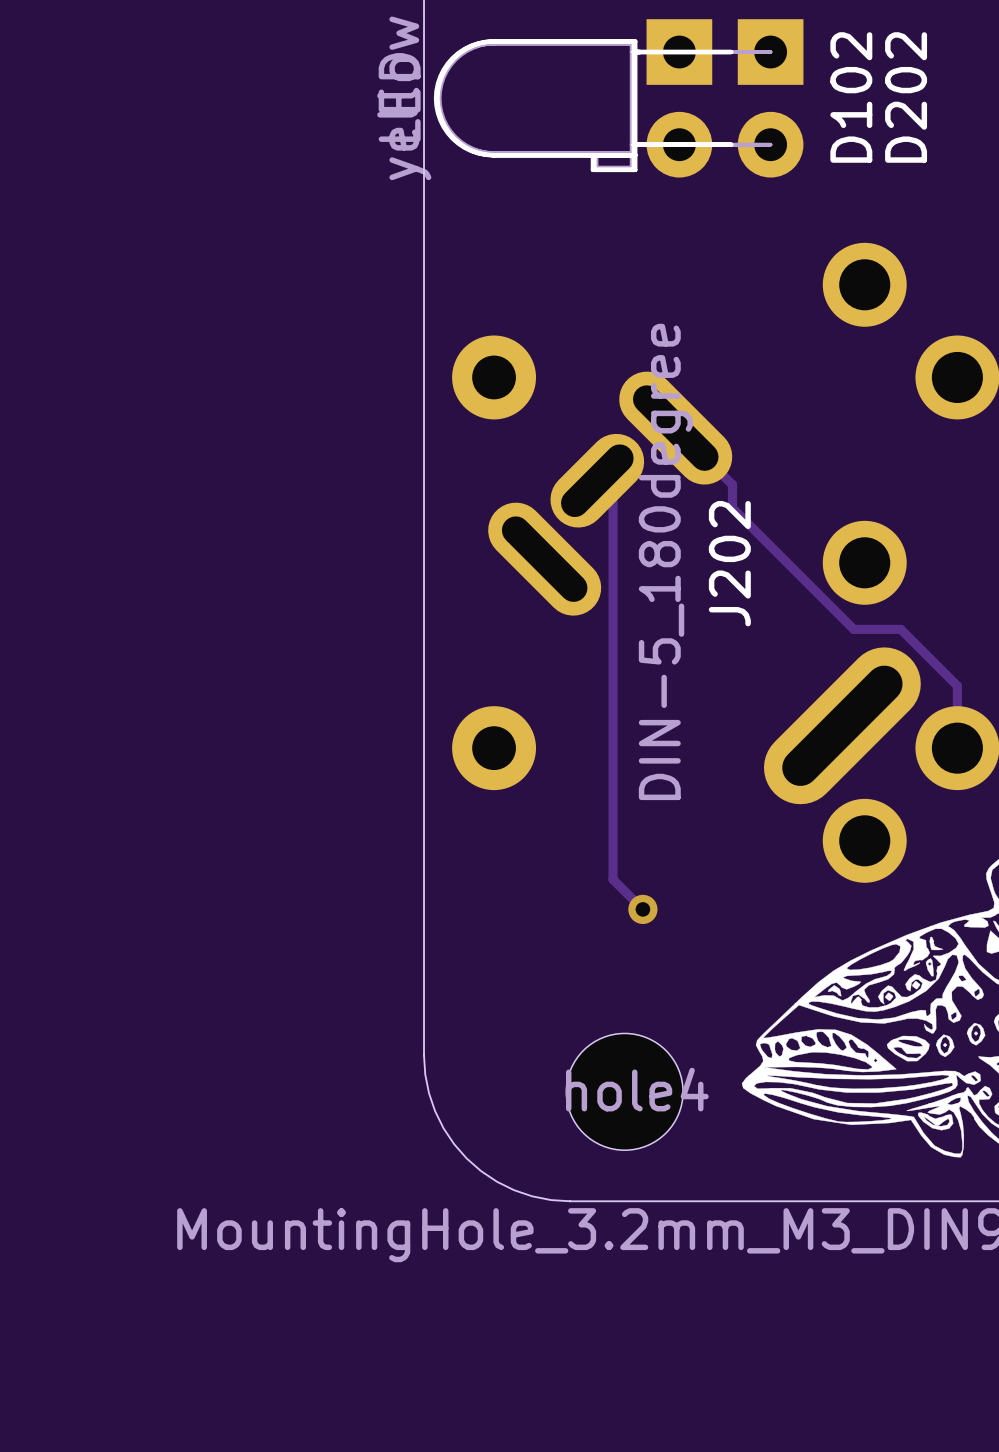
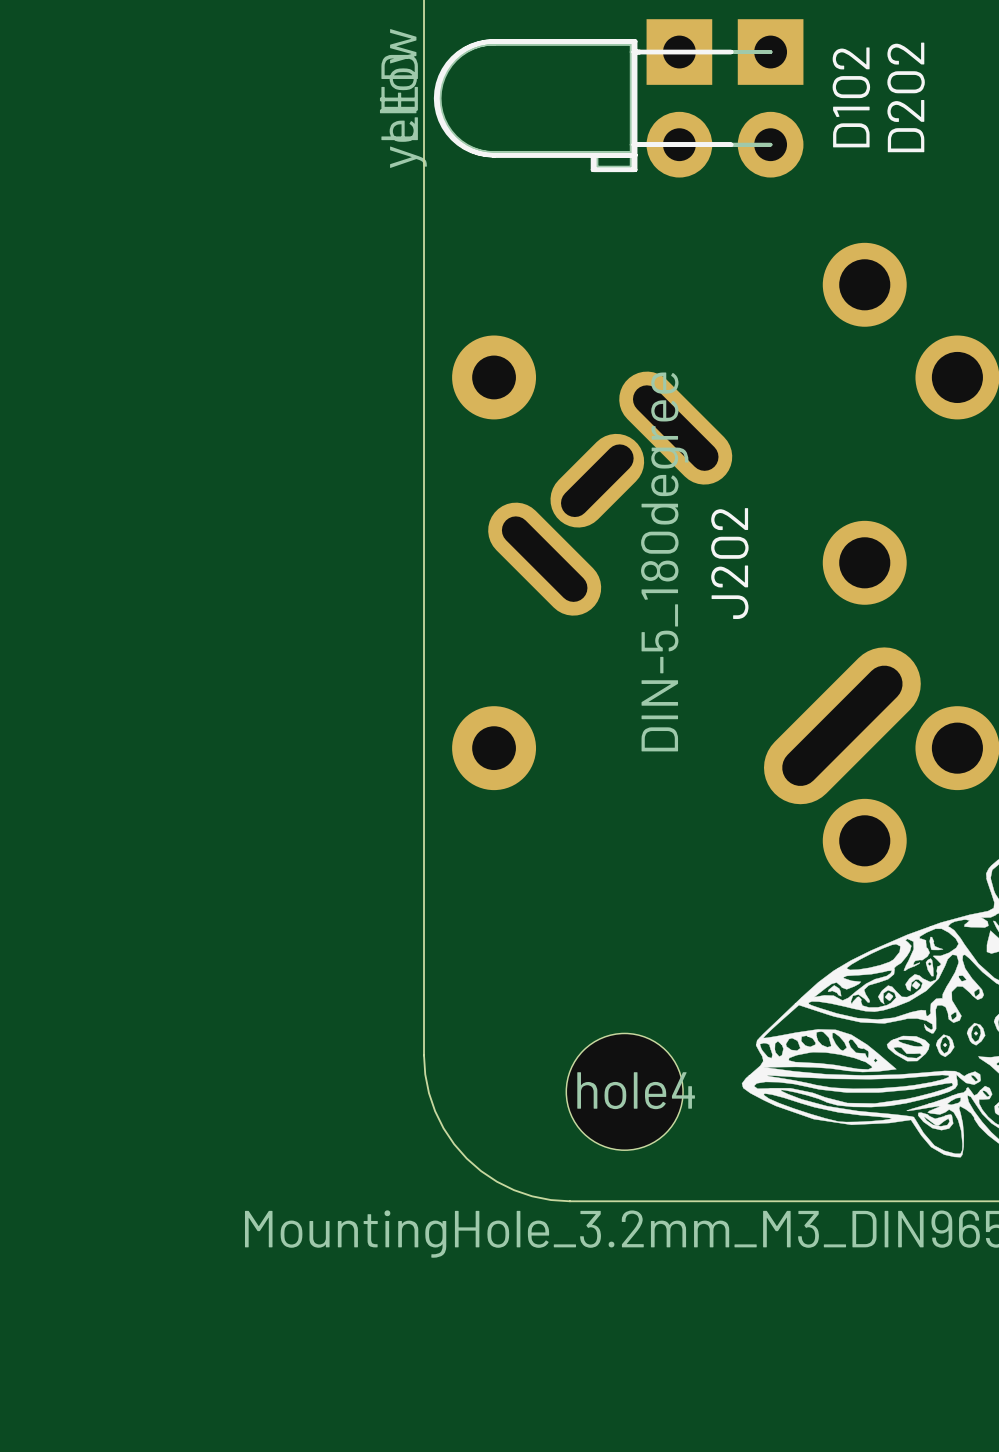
track: (675, 428) (732, 484) (732, 508) (853, 629) (900, 629) (957, 685) (957, 748) -> none
track: (597, 480) (613, 496) (613, 879) (642, 909) -> none
via: (642, 909) -> none

